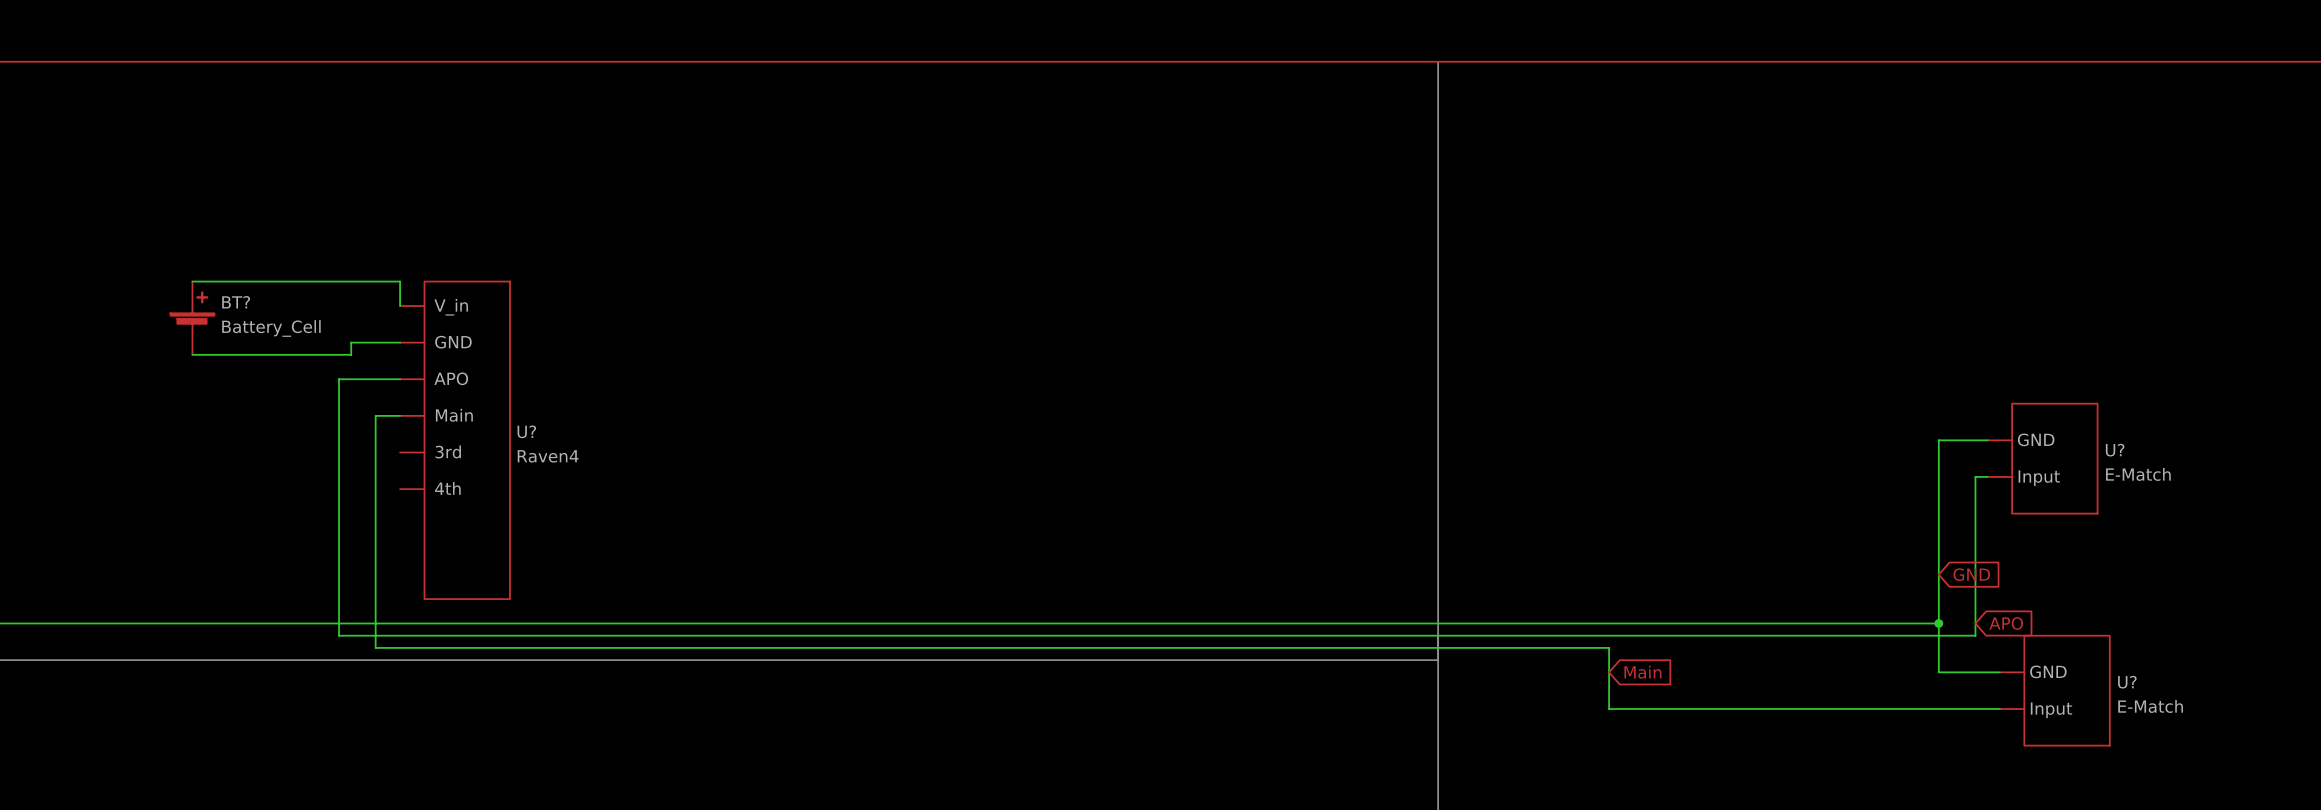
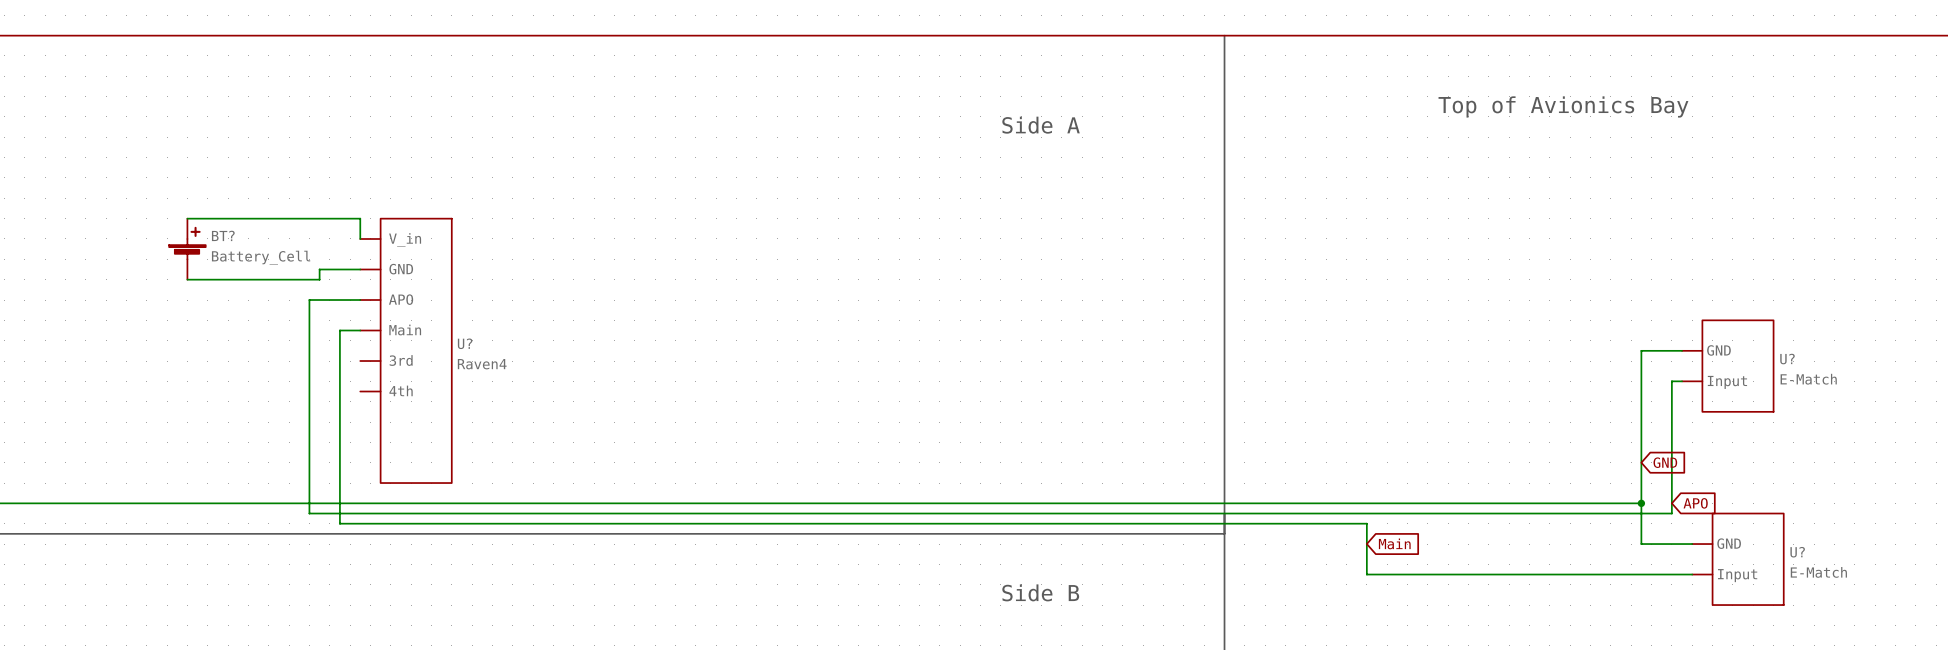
text: none -> Top of Avionics Bay (1563, 106)
text: none -> Side A (1041, 125)
text: none -> Side B (1040, 592)

